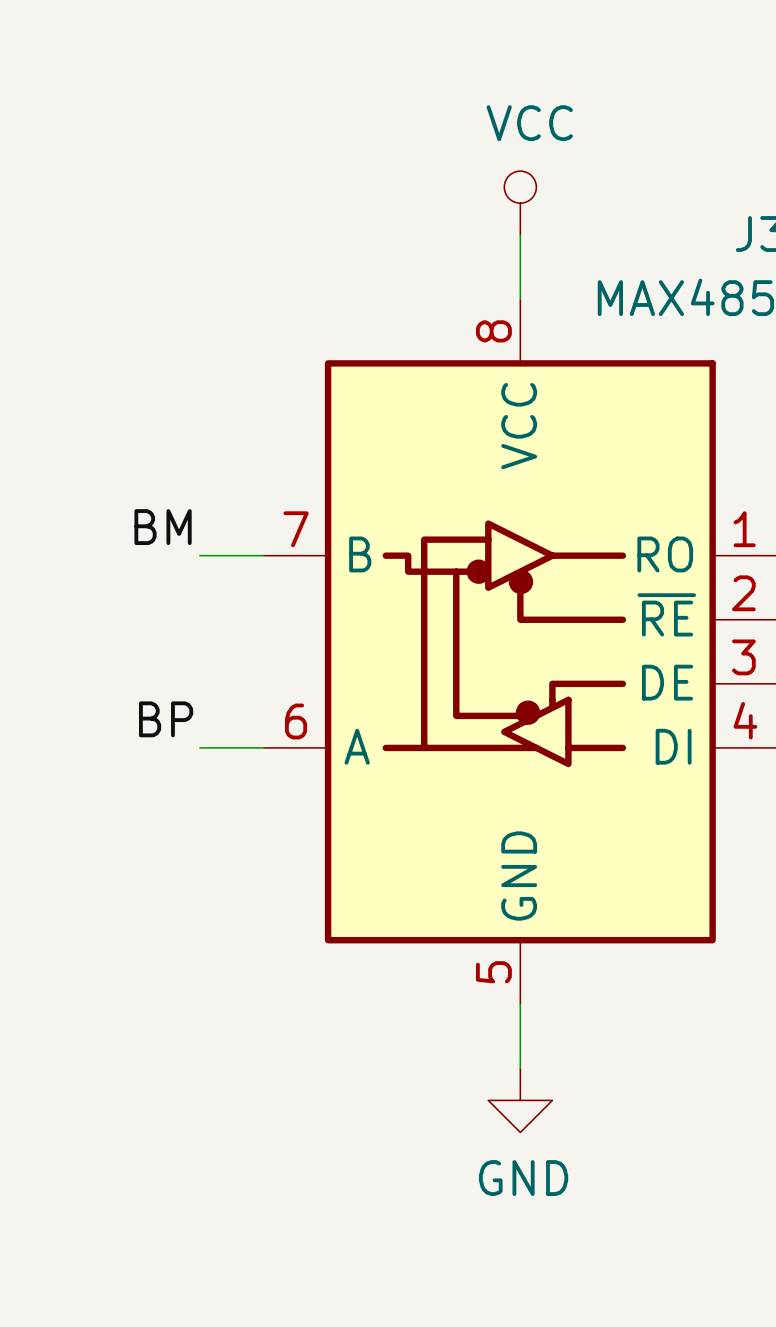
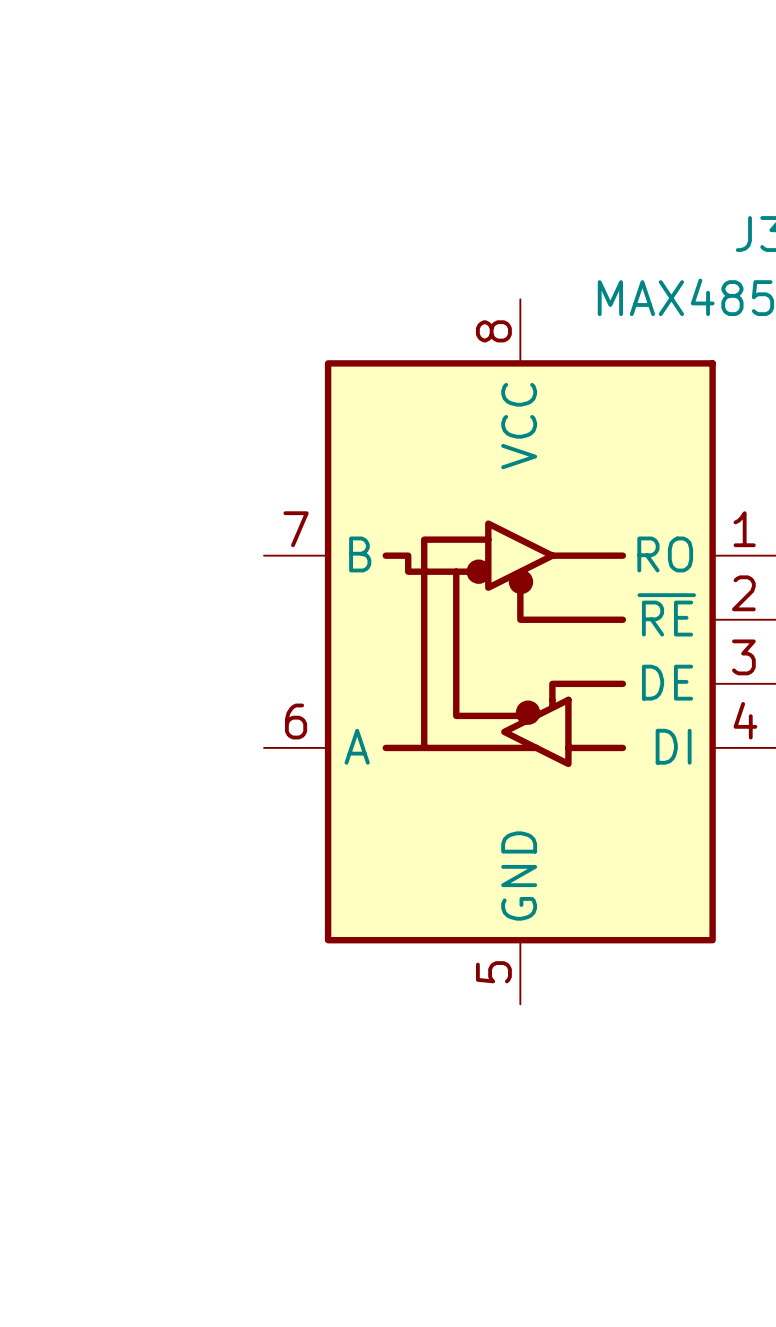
power symbol: VCC (520, 203) -> none
wire: (520, 235) (520, 299) -> none
label: BM (163, 527) -> none
wire: (199, 555) (264, 555) -> none
label: BP (166, 719) -> none
wire: (199, 747) (264, 747) -> none
wire: (520, 1004) (520, 1068) -> none
power symbol: GND (520, 1100) -> none

